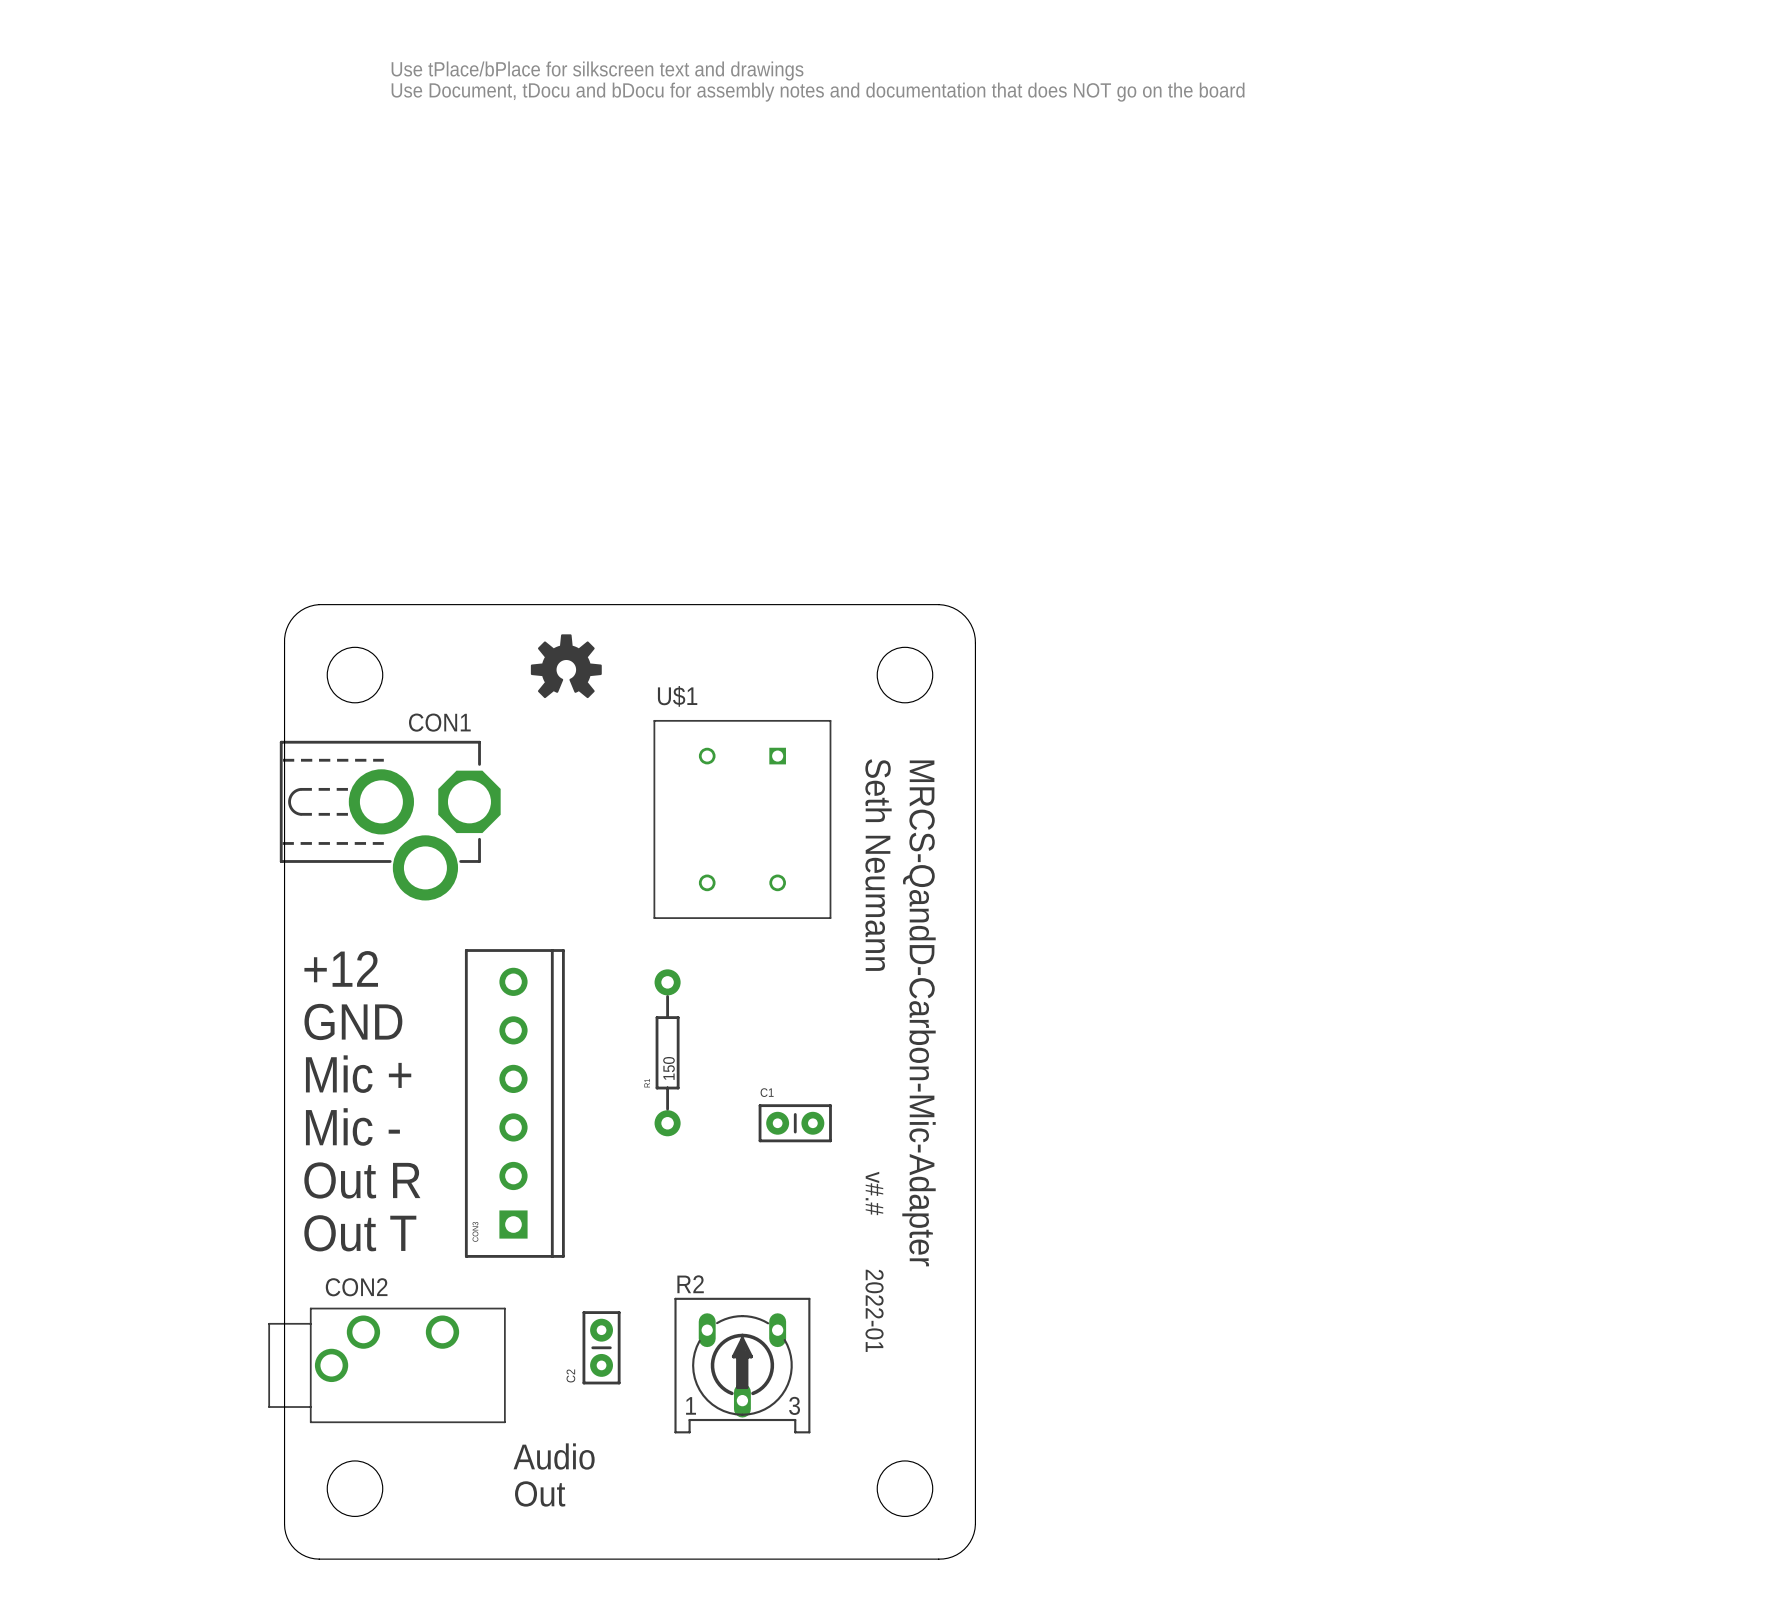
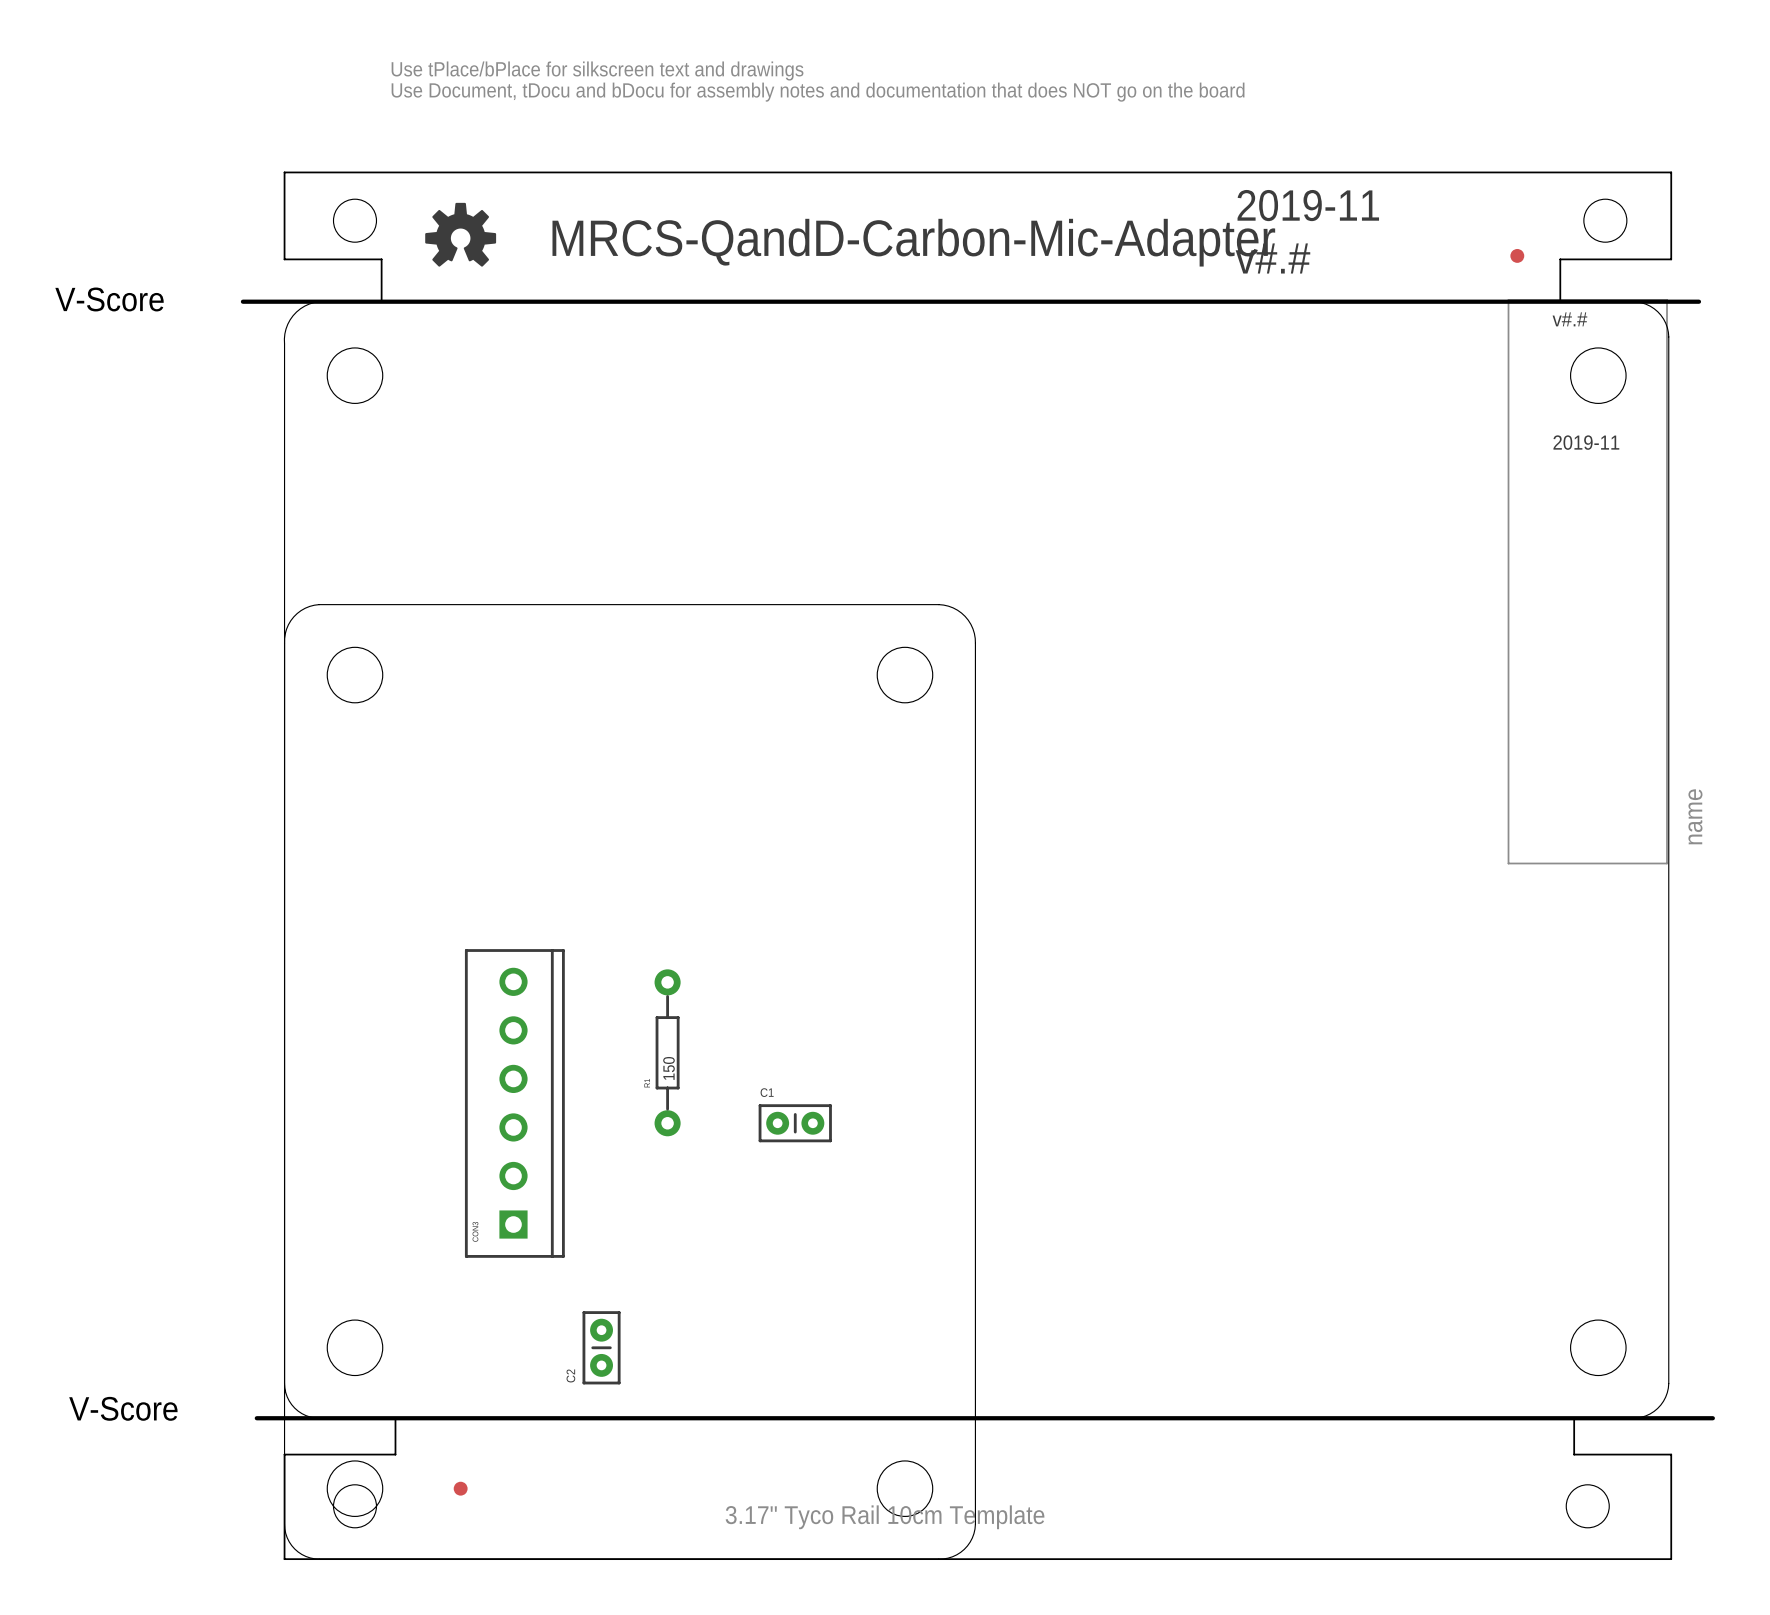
drawing: none -> [425, 202, 497, 267]
text: none -> 2019-11 (1308, 205)
text: none -> MRCS-QandD-Carbon-Mic-Adapter (913, 242)
part: none -> (1517, 255)
text: none -> v#.# (1272, 258)
text: none -> v#.# (1569, 319)
text: none -> 2019-11 (1586, 442)
drawing: [530, 634, 602, 699] -> none
U$1: (742, 819) -> none
CON1: (390, 820) -> none
text: Seth Neumann (878, 865) -> none
part: none -> (977, 865)
text: +12 (341, 968) -> none
text: MRCS-QandD-Carbon-Mic-Adapter (919, 1013) -> none
text: GND (353, 1021) -> none
text: Mic + (358, 1074) -> none
text: Mic - (352, 1126) -> none
text: Out R (362, 1180) -> none
text: v#.# (874, 1193) -> none
text: Out T (360, 1233) -> none
text: 2022-01 (874, 1310) -> none
CON2: (387, 1365) -> none
R2: (742, 1365) -> none
text: Audio (554, 1456) -> none
part: none -> (460, 1488)
text: Out (540, 1493) -> none

